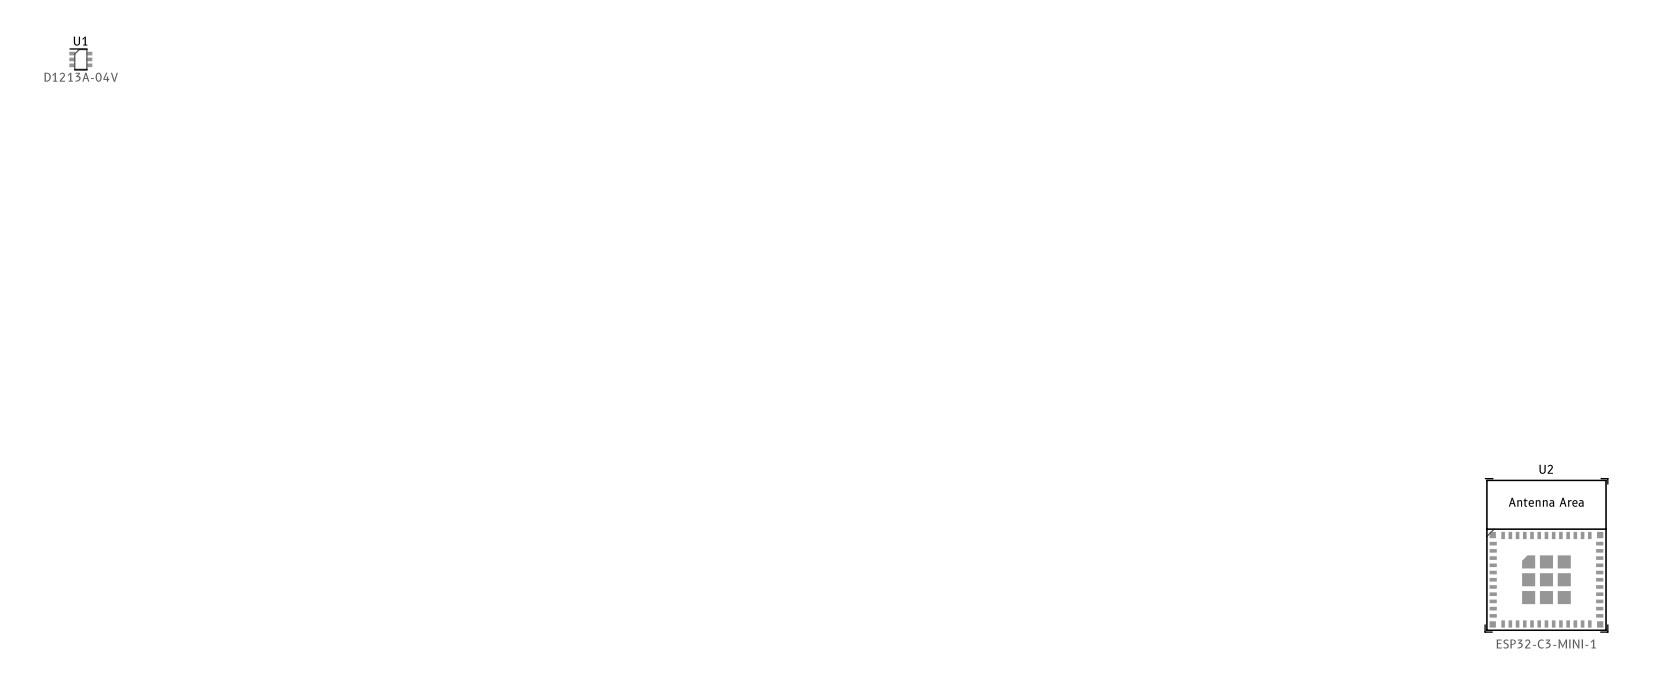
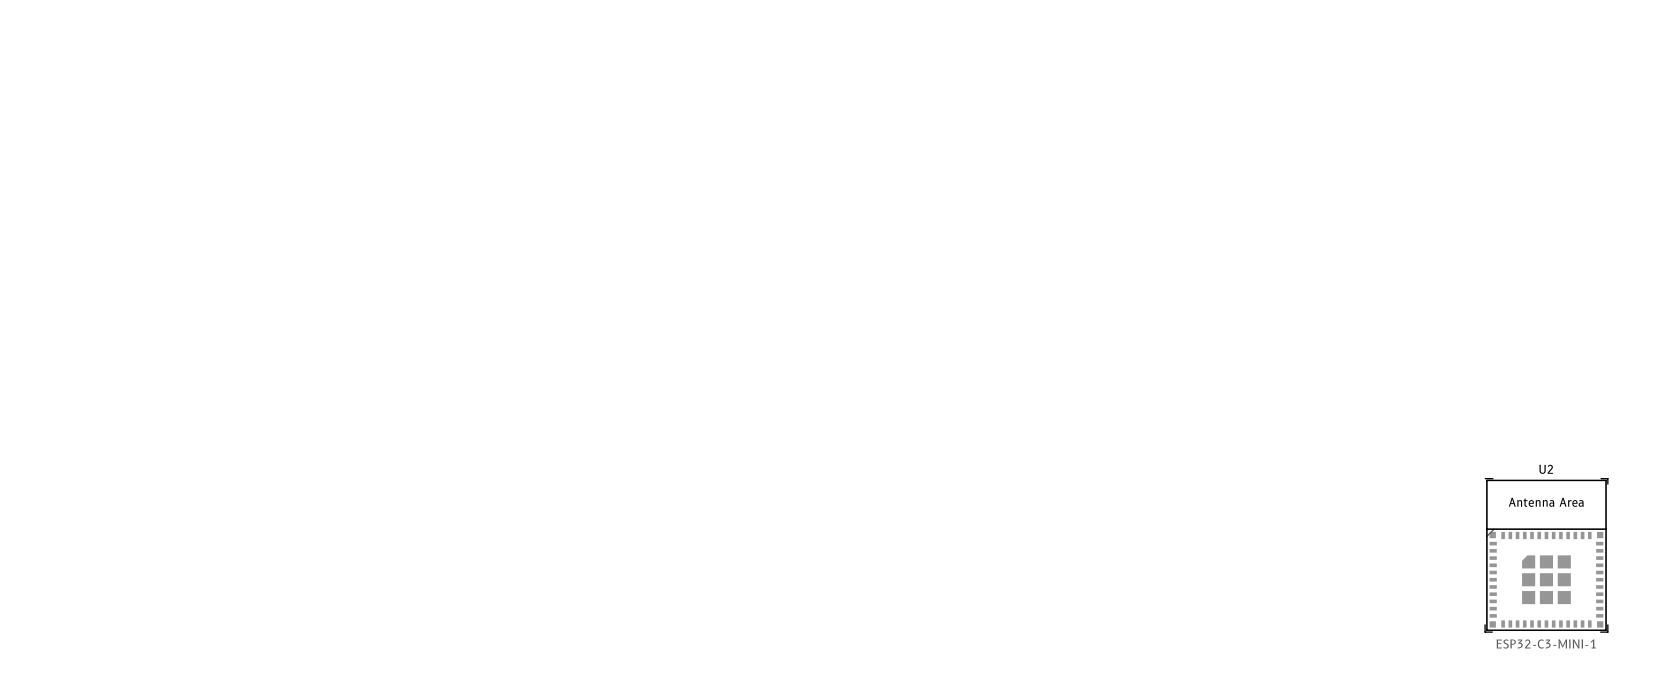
U1: D1213A-04V (80, 59) -> none

